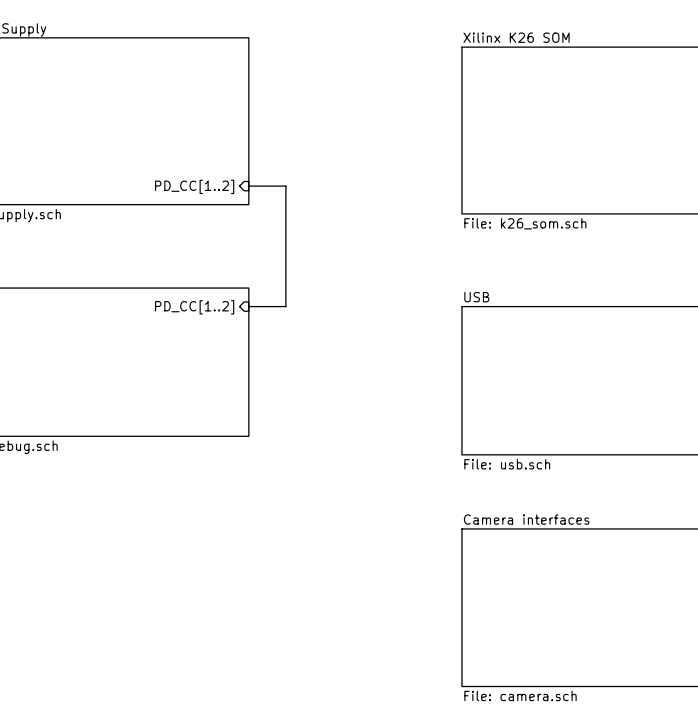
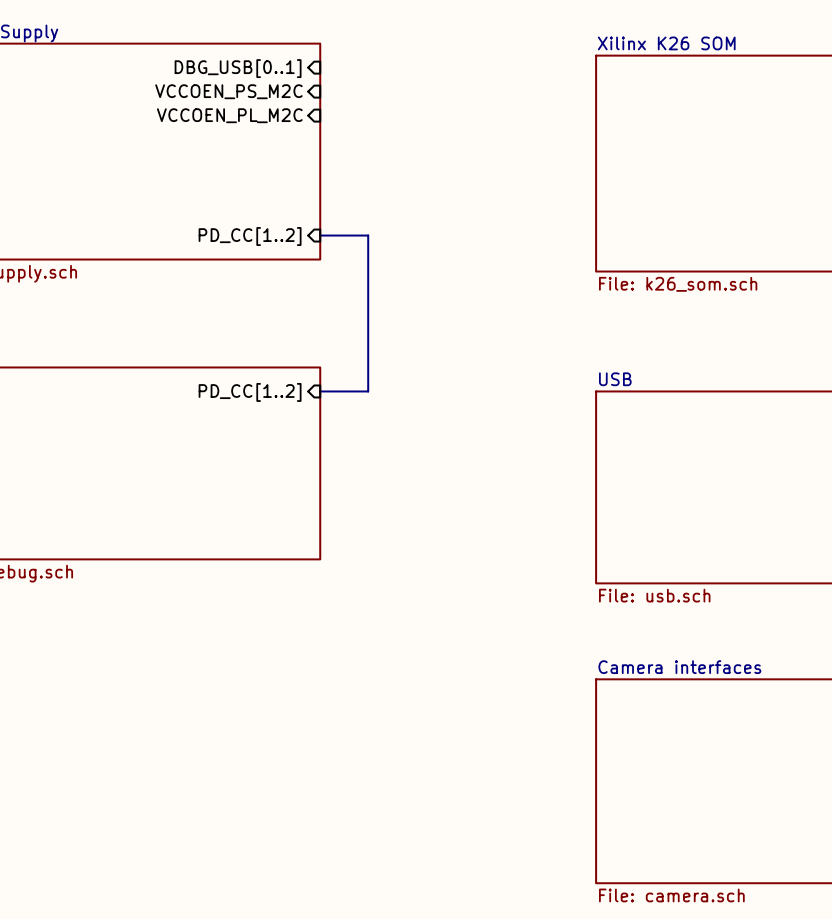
sheet pin: none -> DBG_USB[0..1] (238, 68)
sheet pin: none -> VCCOEN_PS_M2C (228, 91)
sheet pin: none -> VCCOEN_PL_M2C (229, 115)

